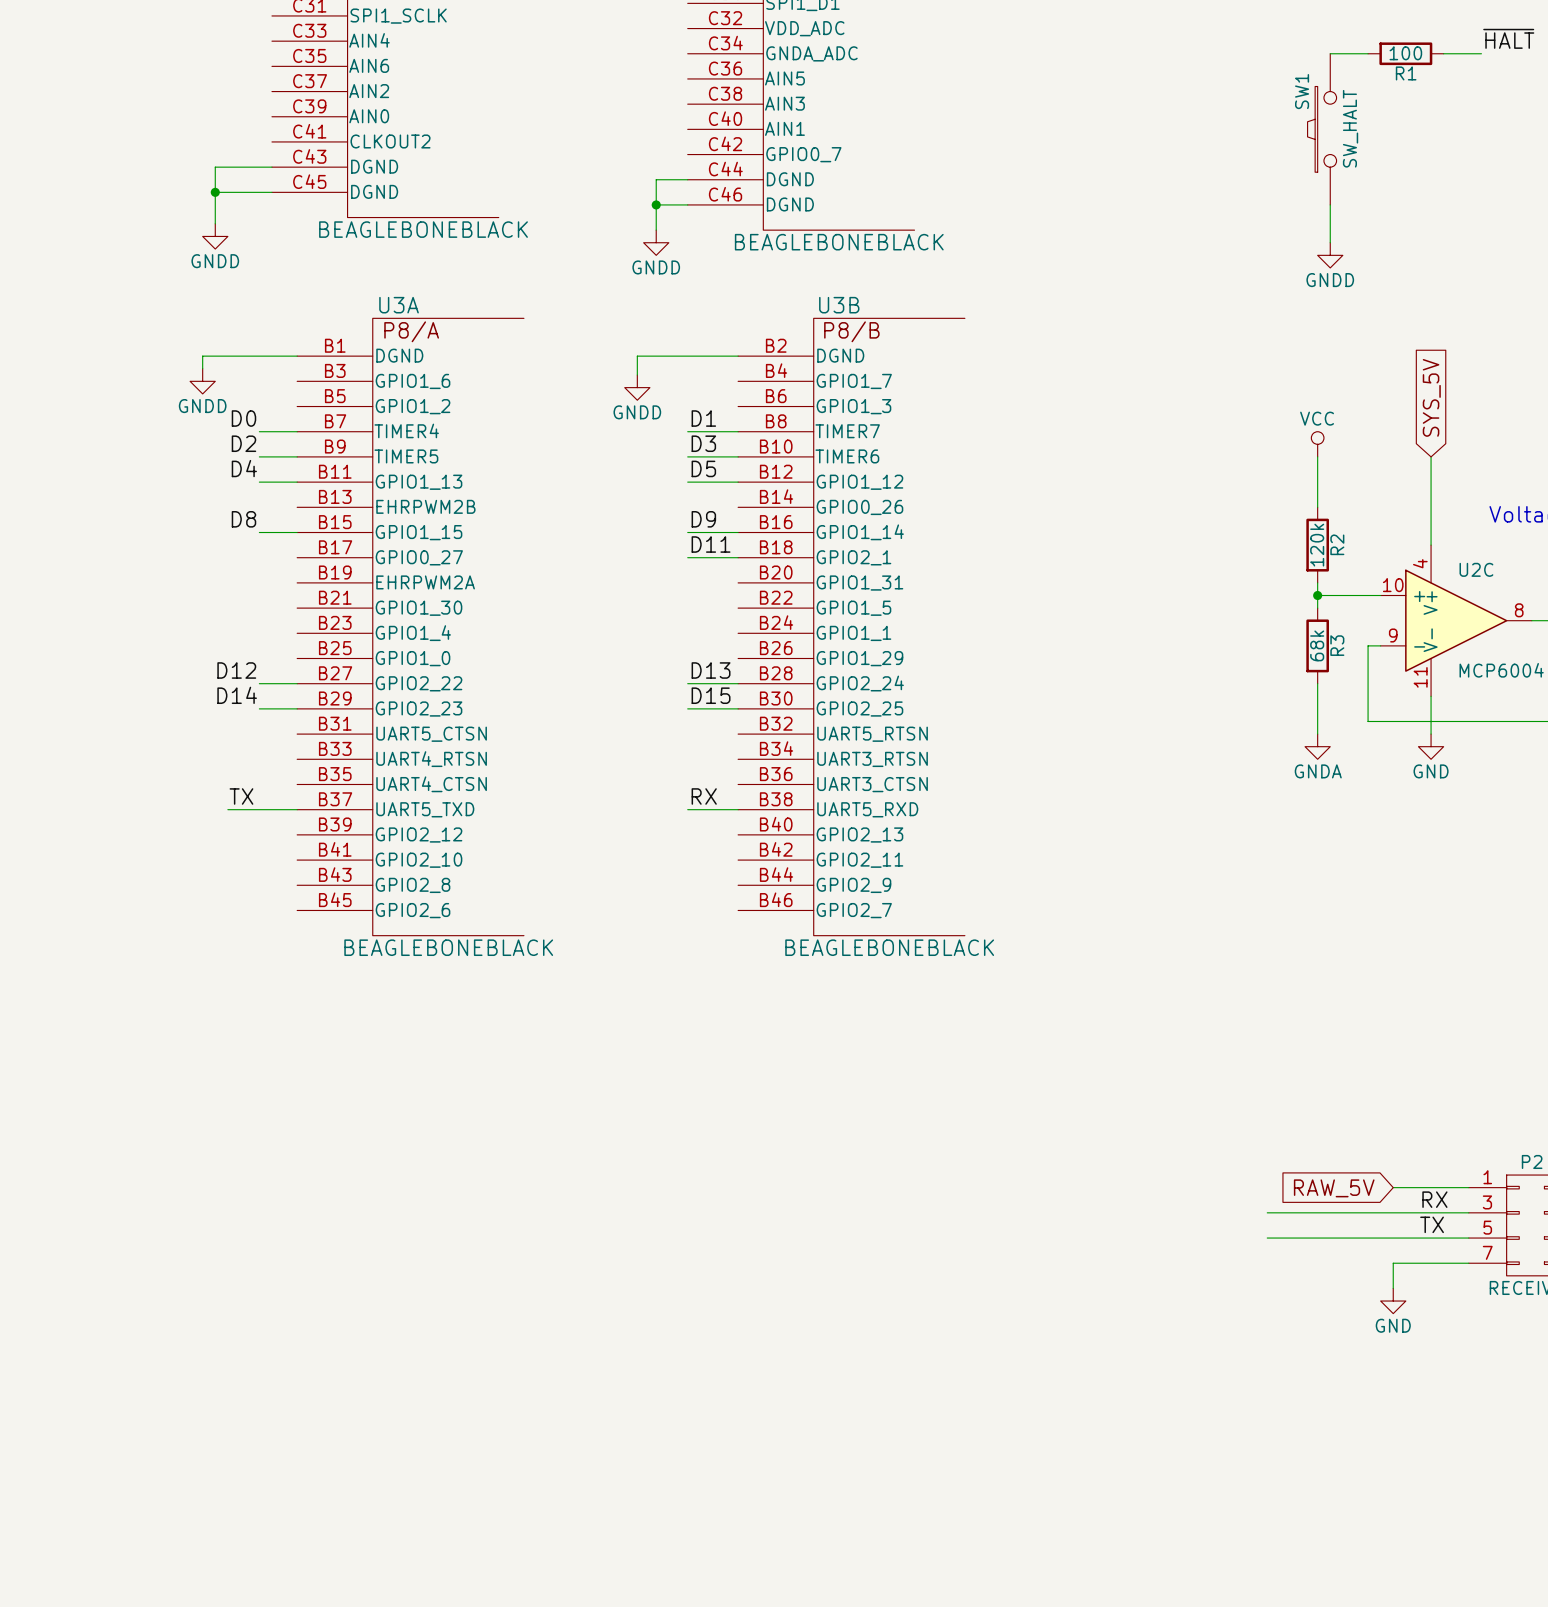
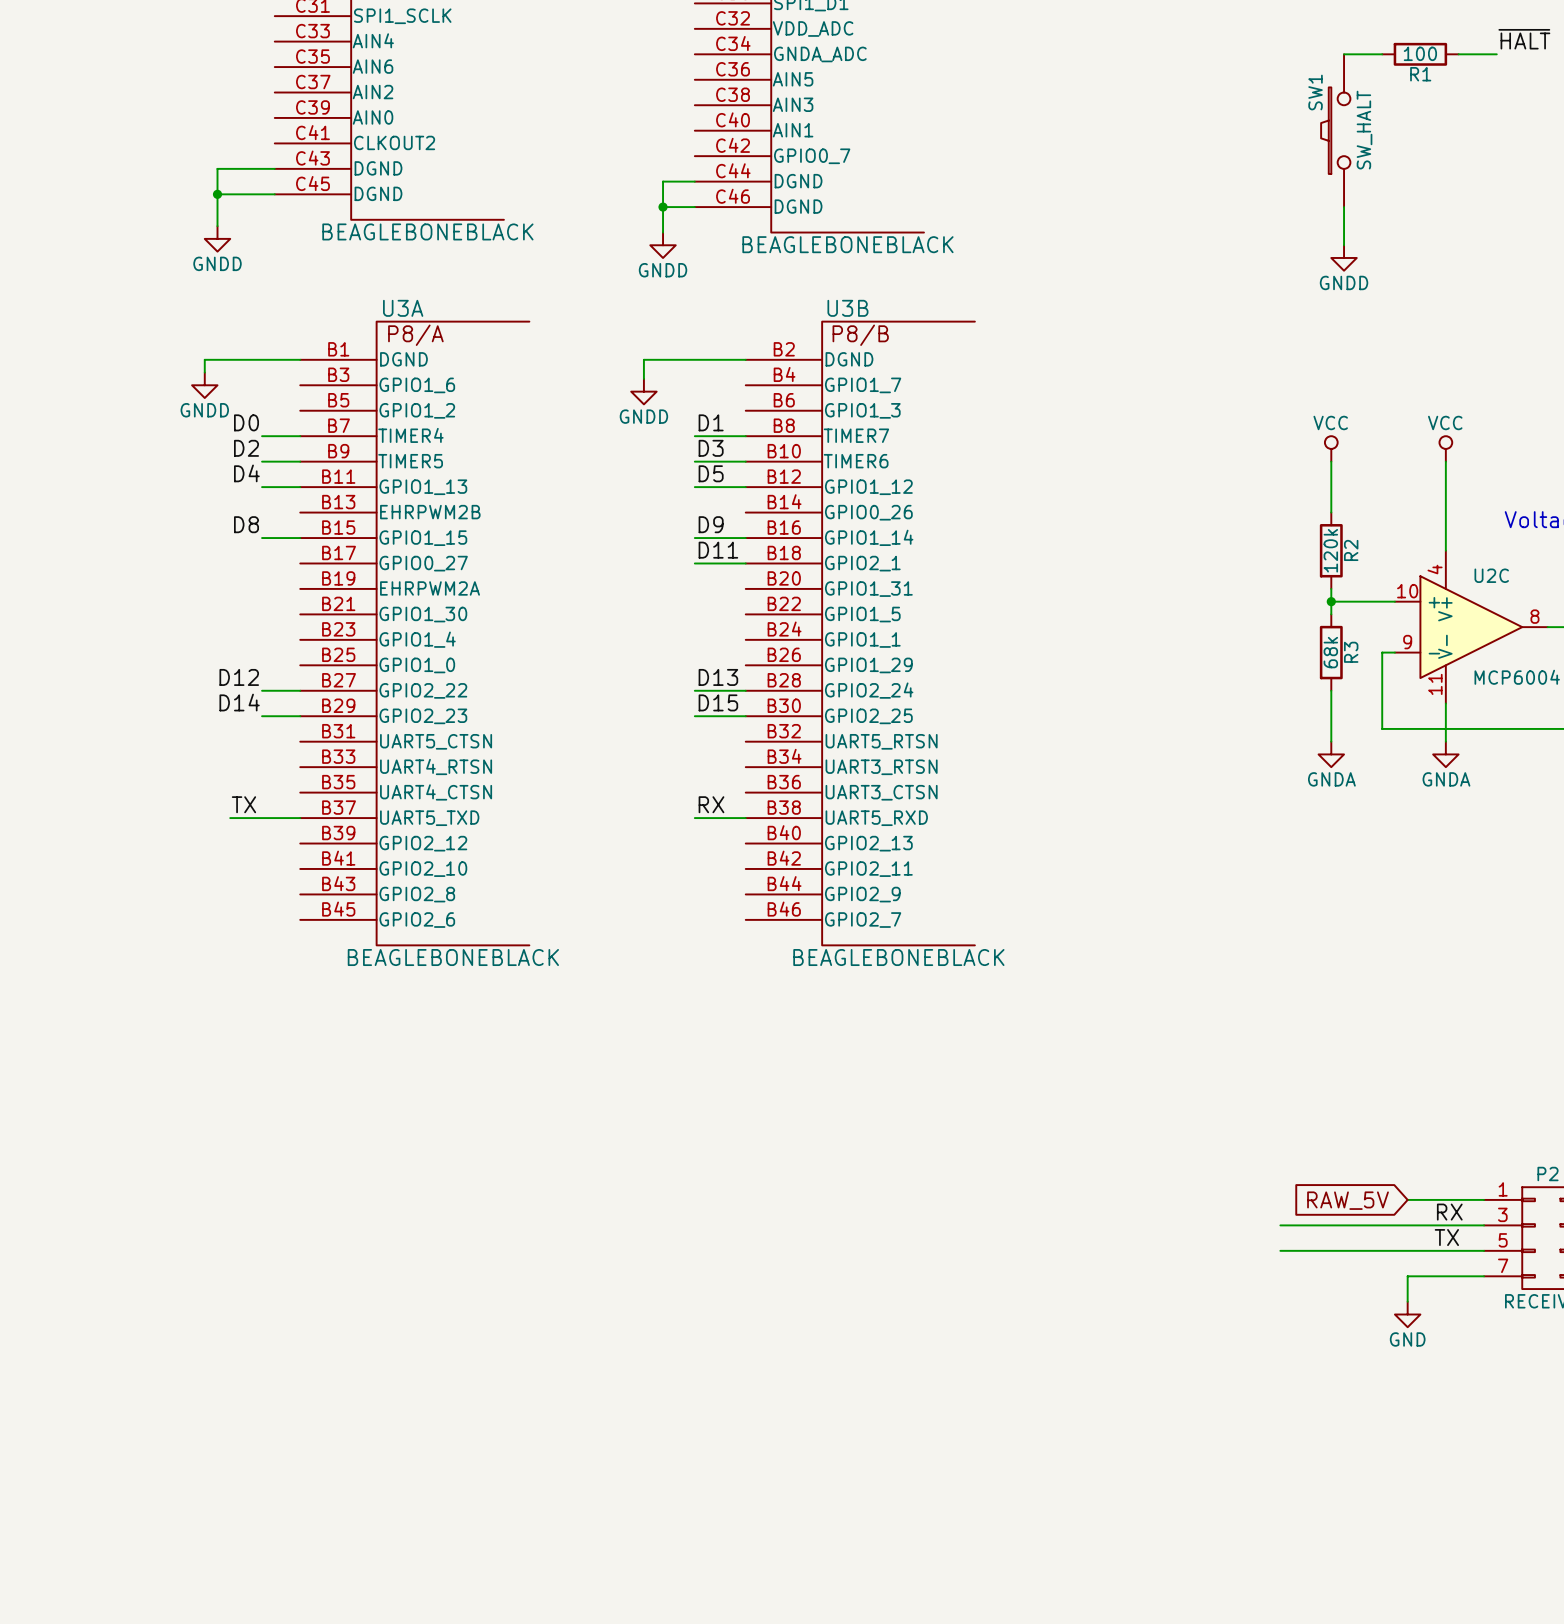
global label: SYS_5V (1431, 397) -> none
power symbol: none -> VCC (1445, 448)
power symbol: GND (1431, 746) -> GNDA (1445, 754)

